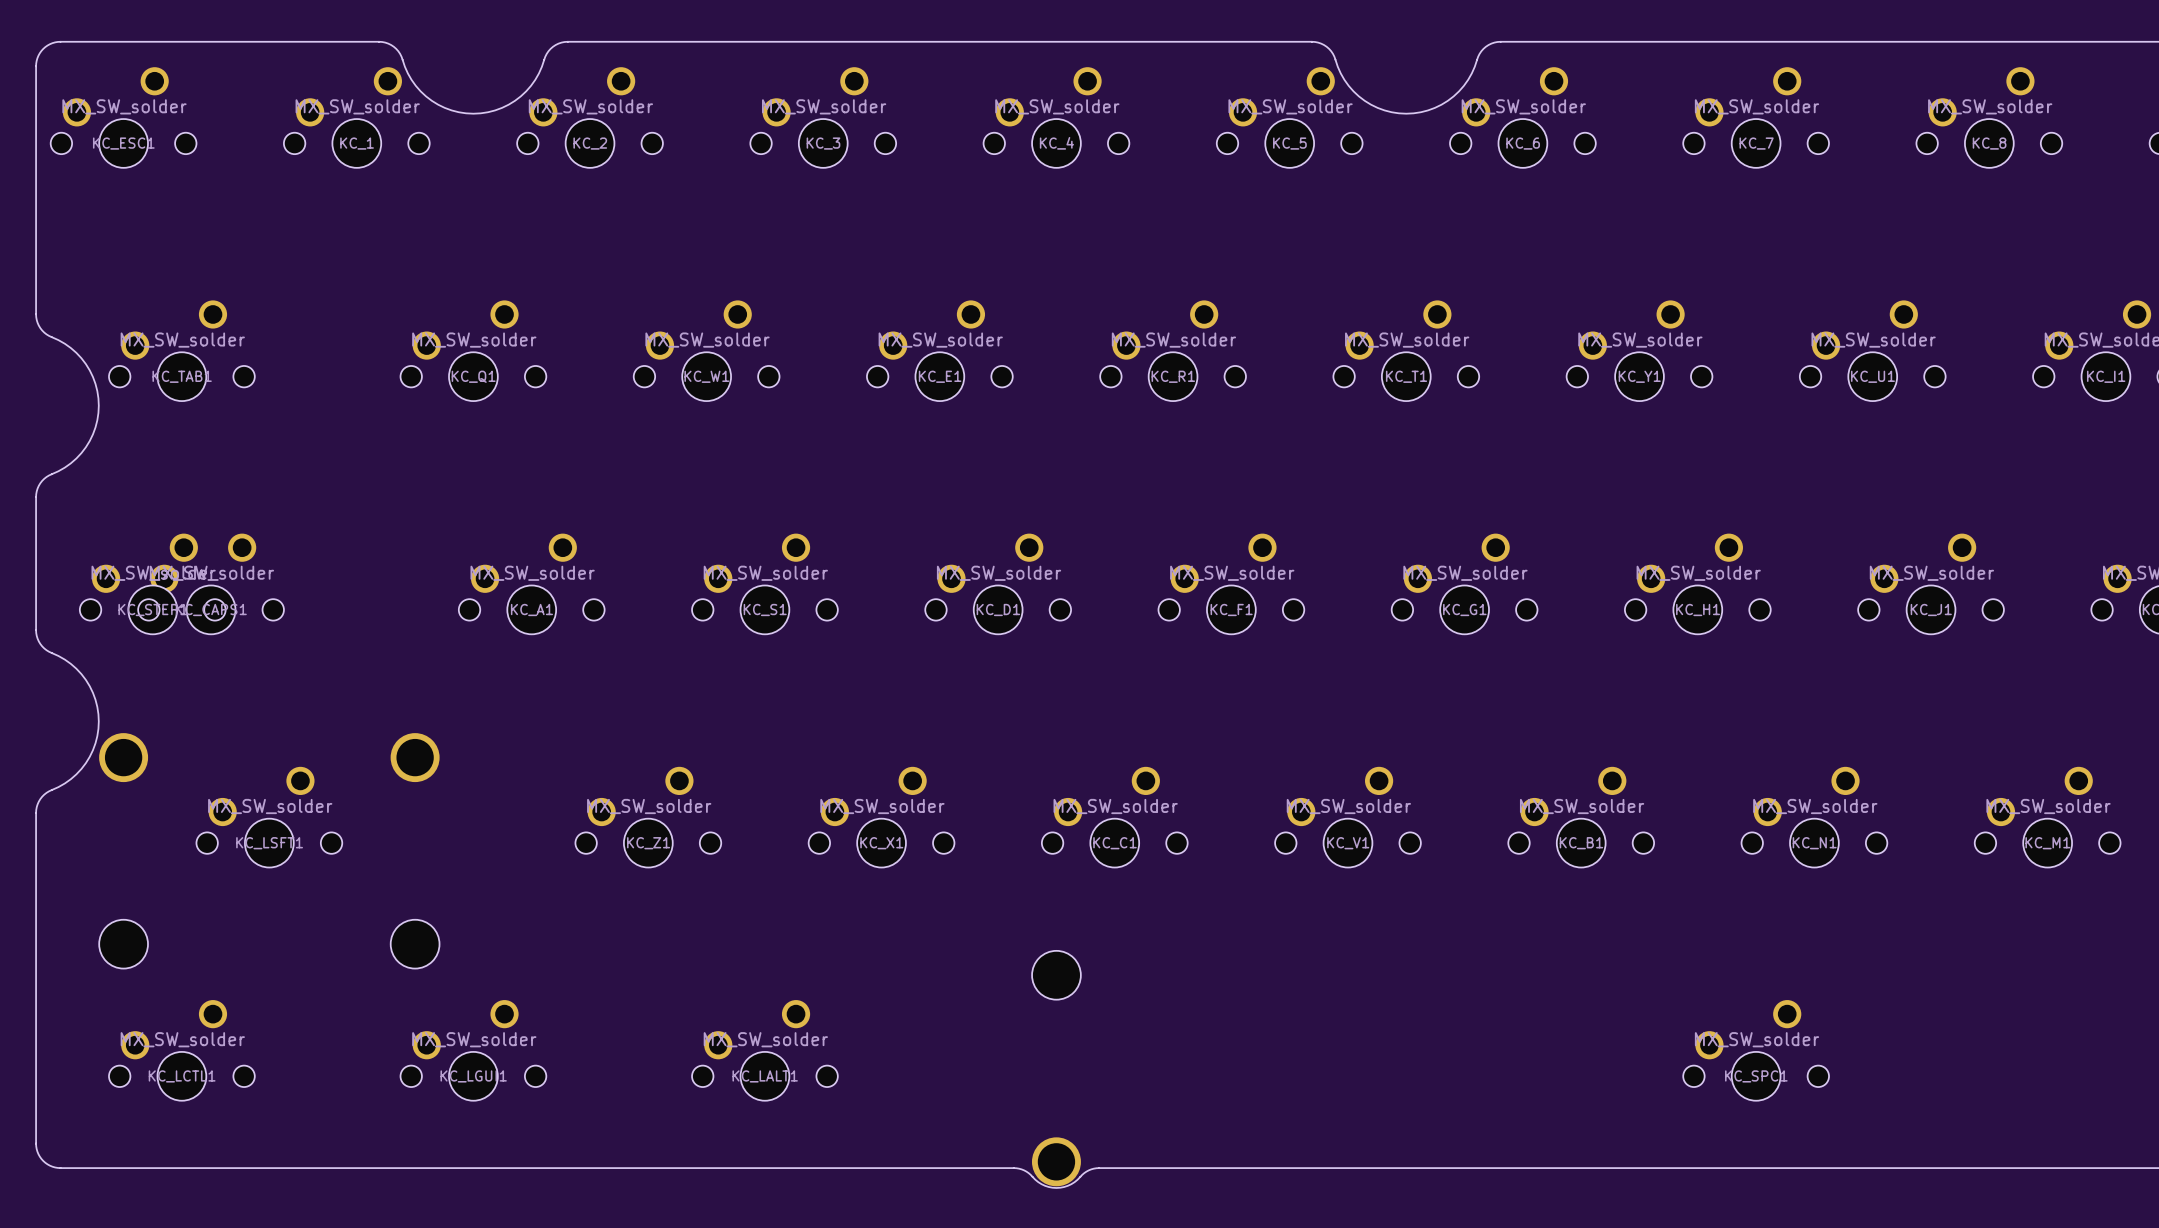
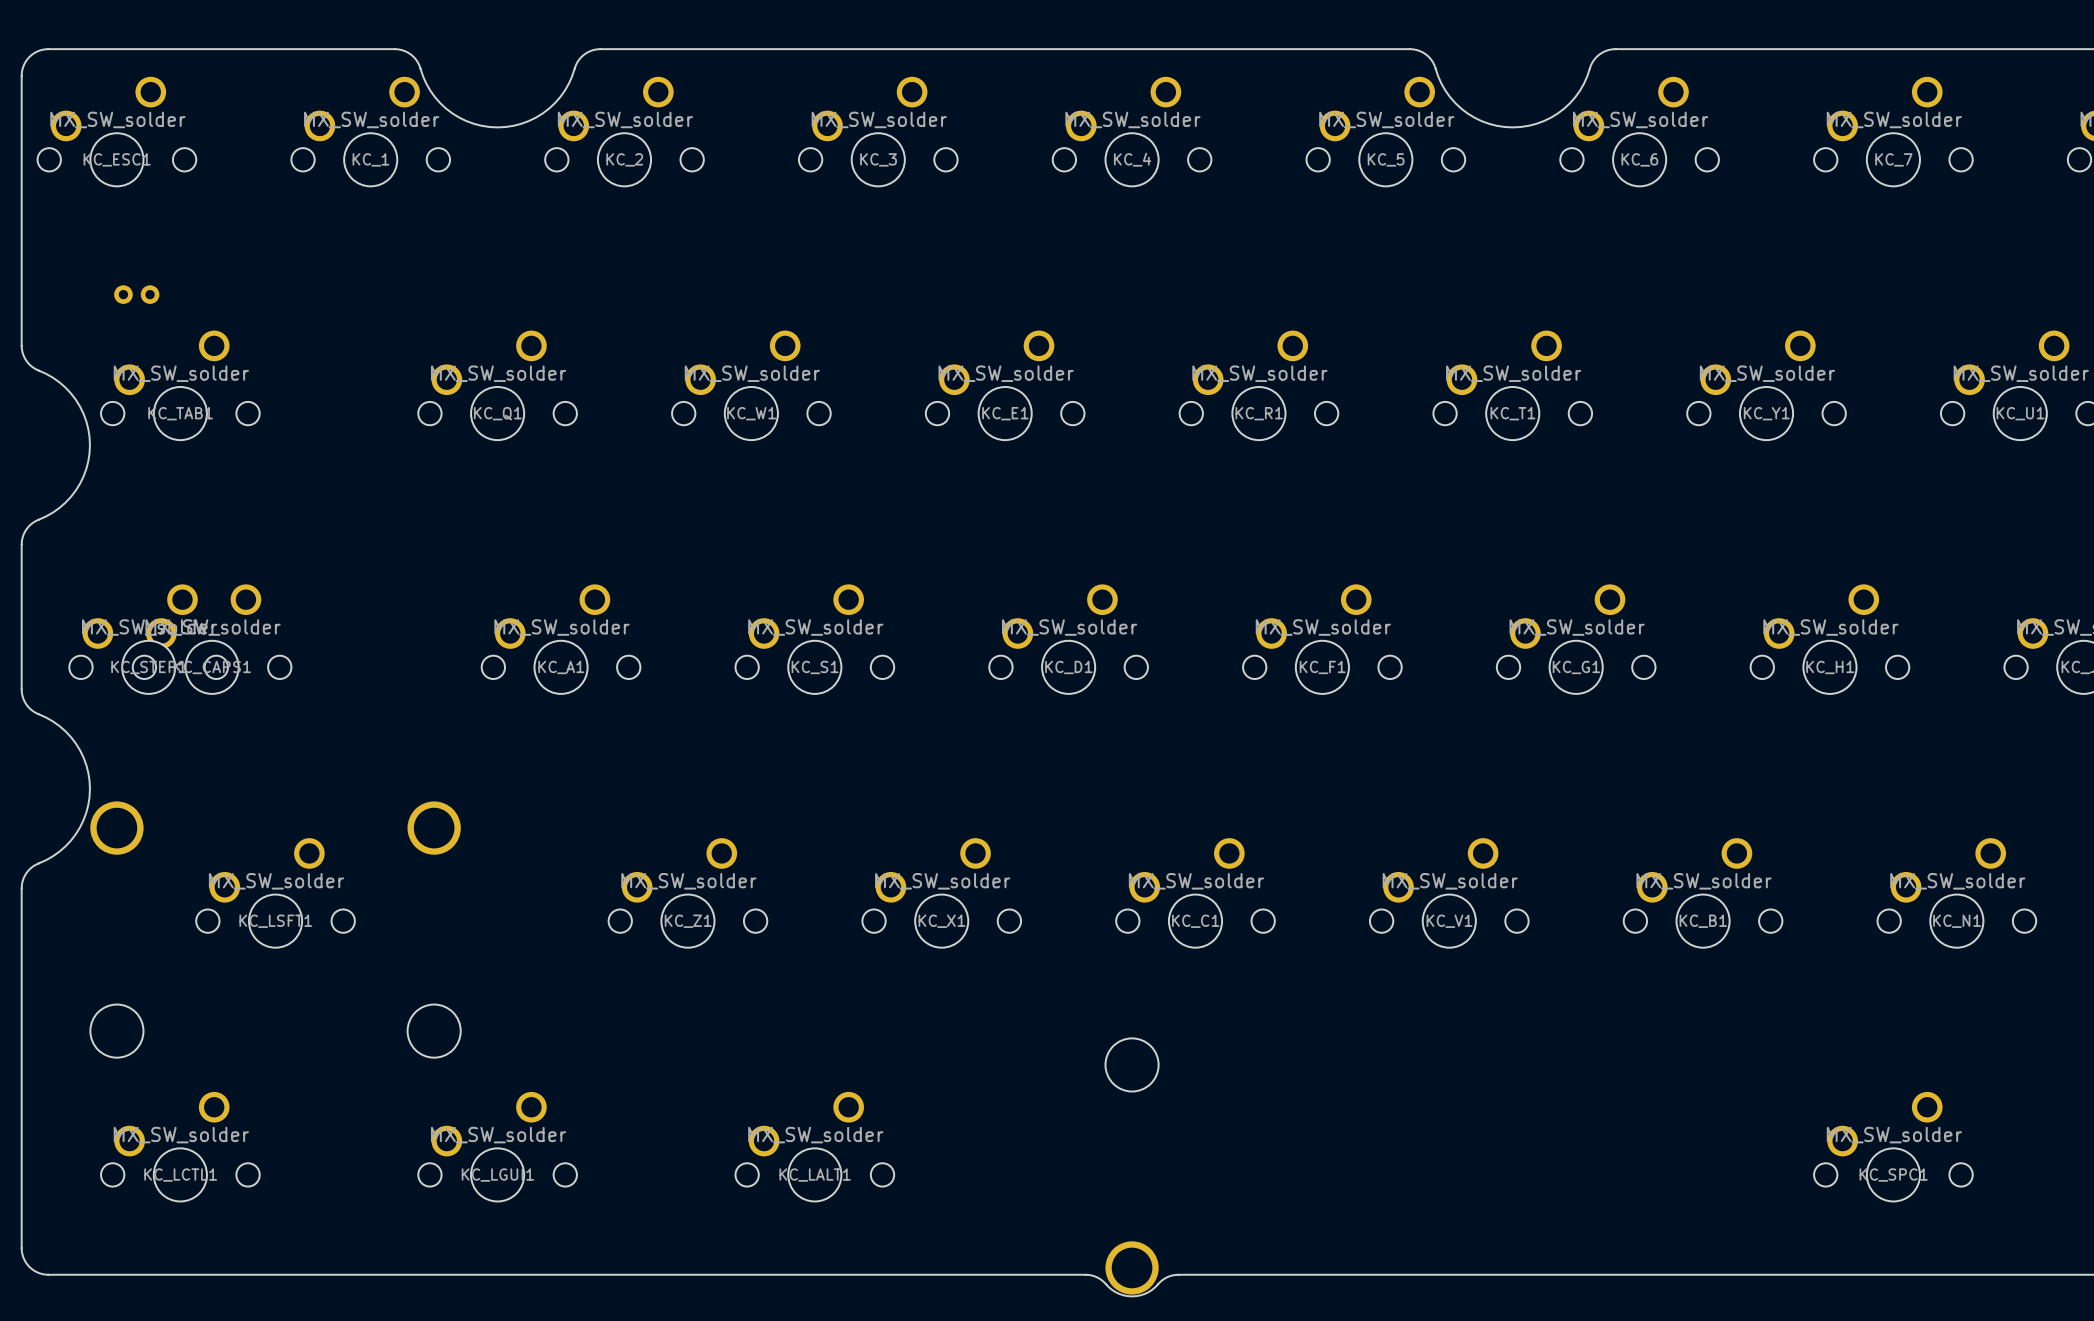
part: none -> (136, 294)

